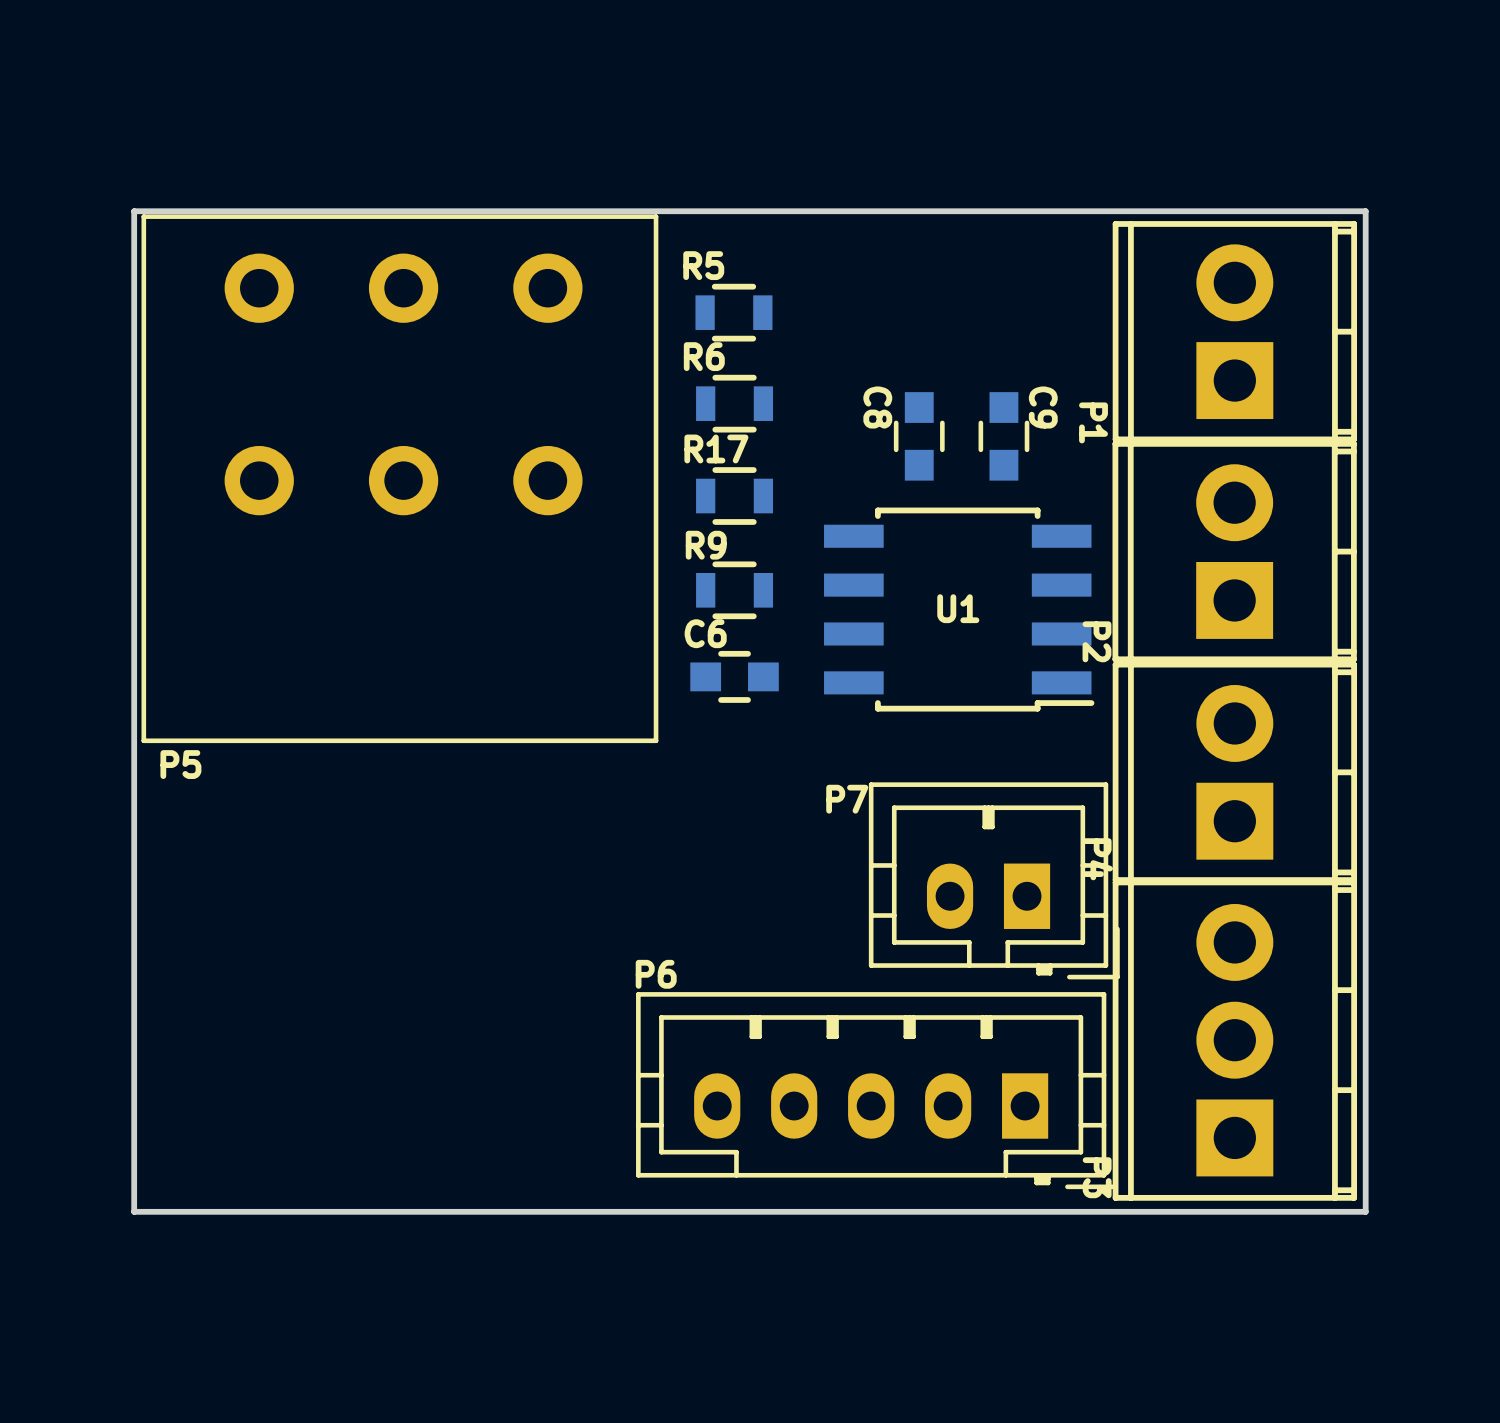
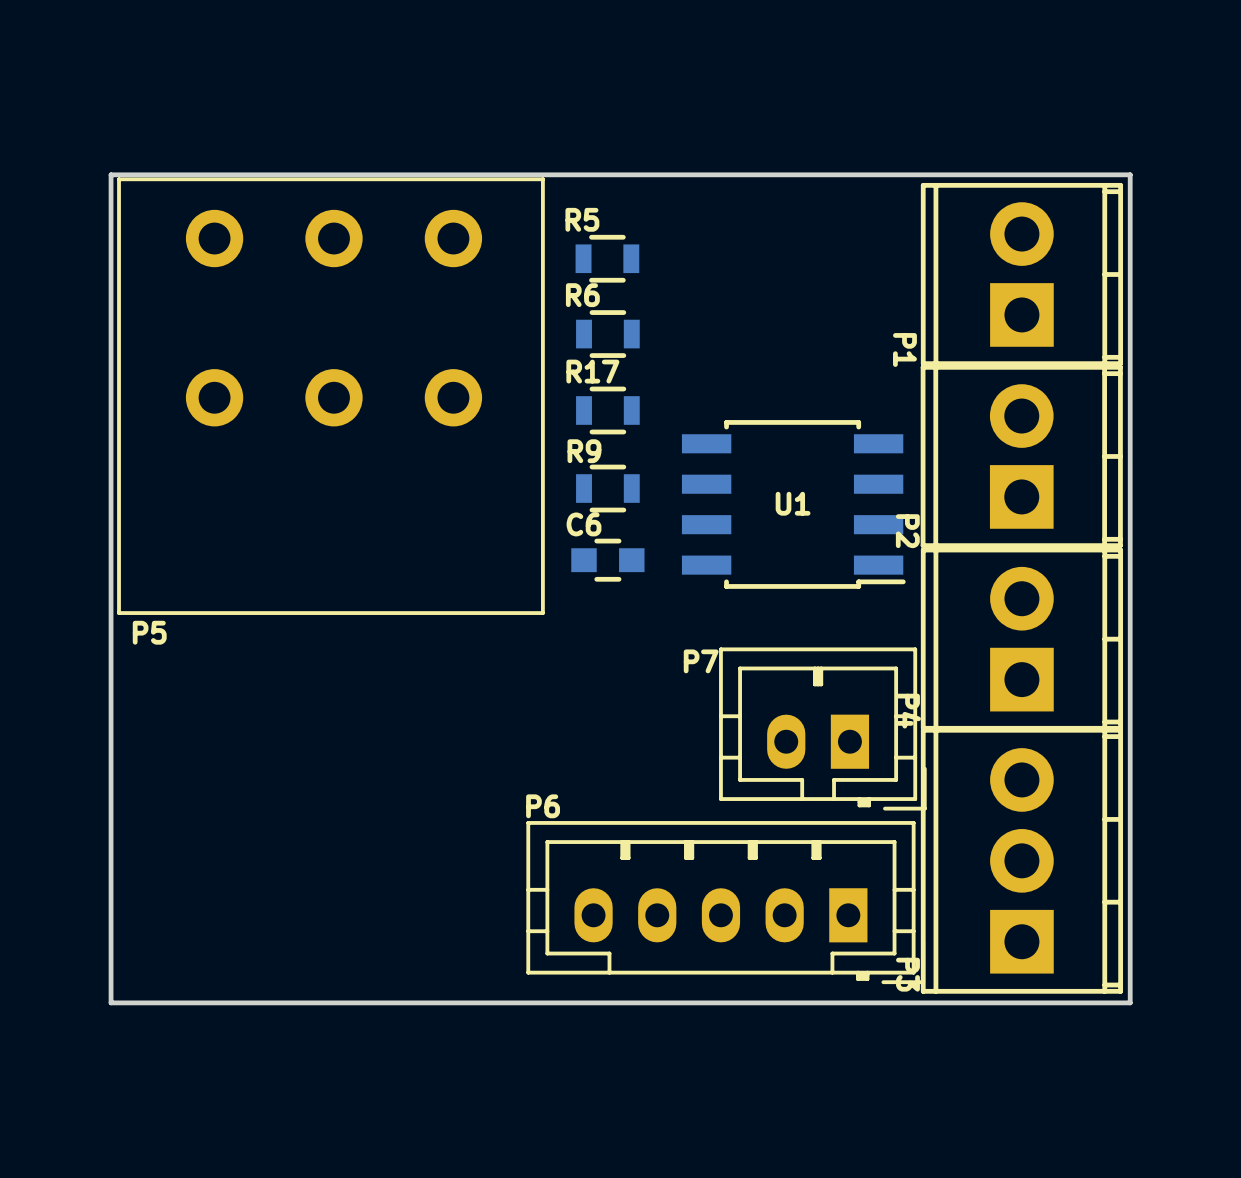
C8: (919, 436) -> none
C9: (1003, 436) -> none

